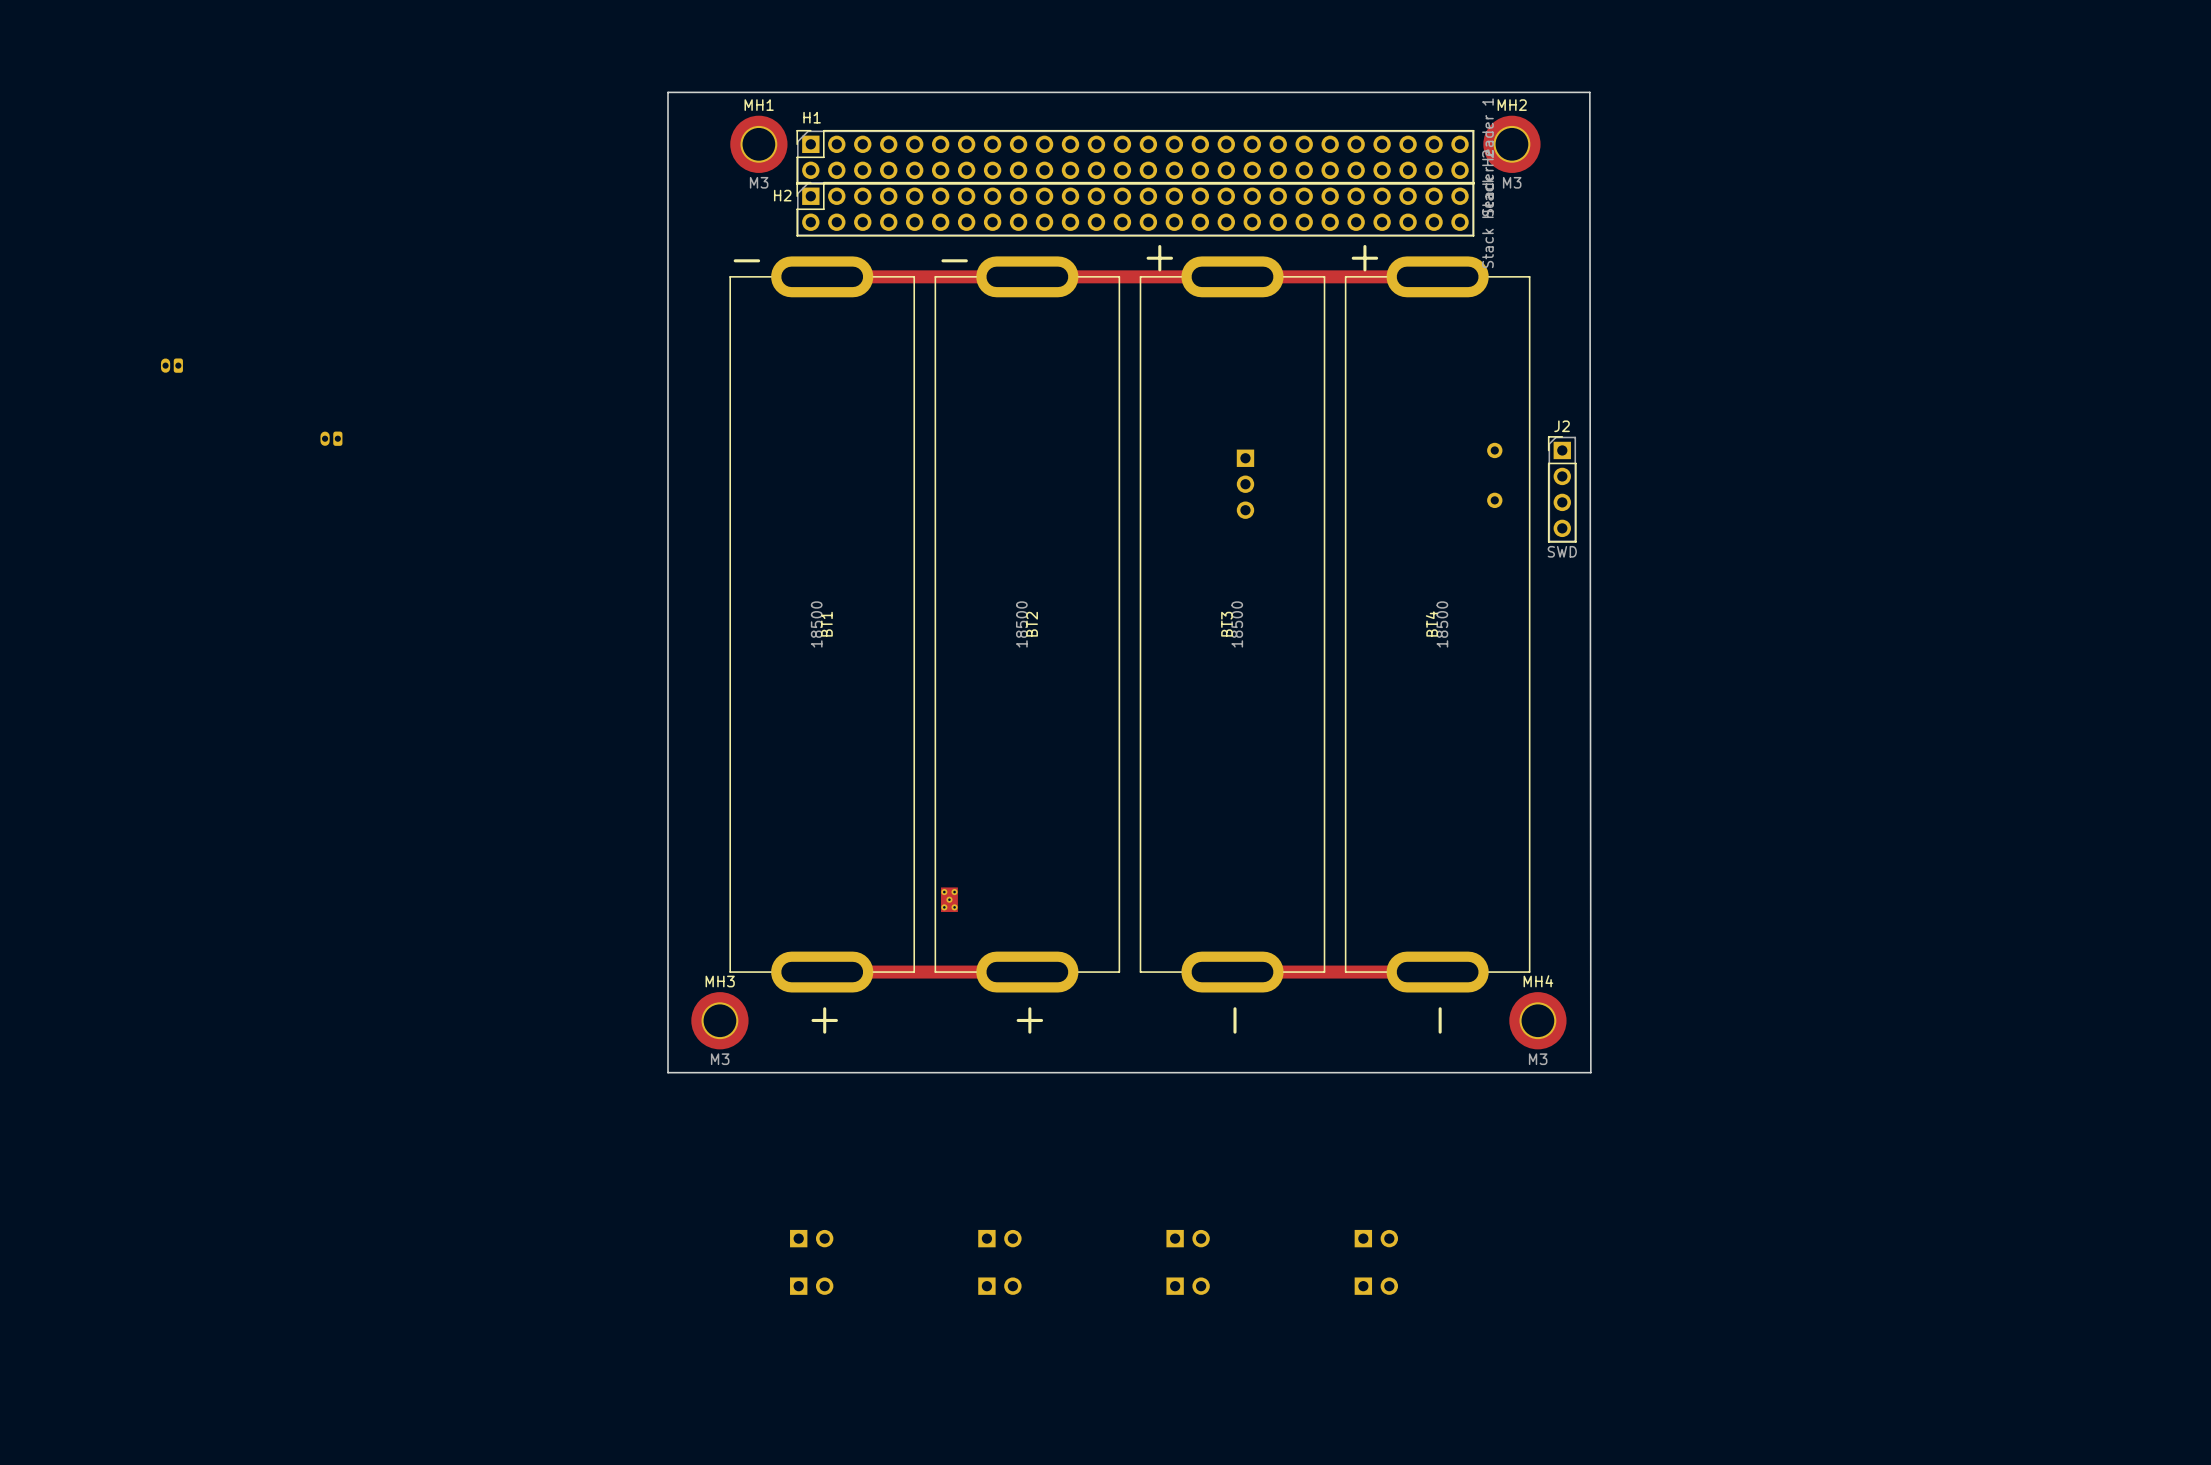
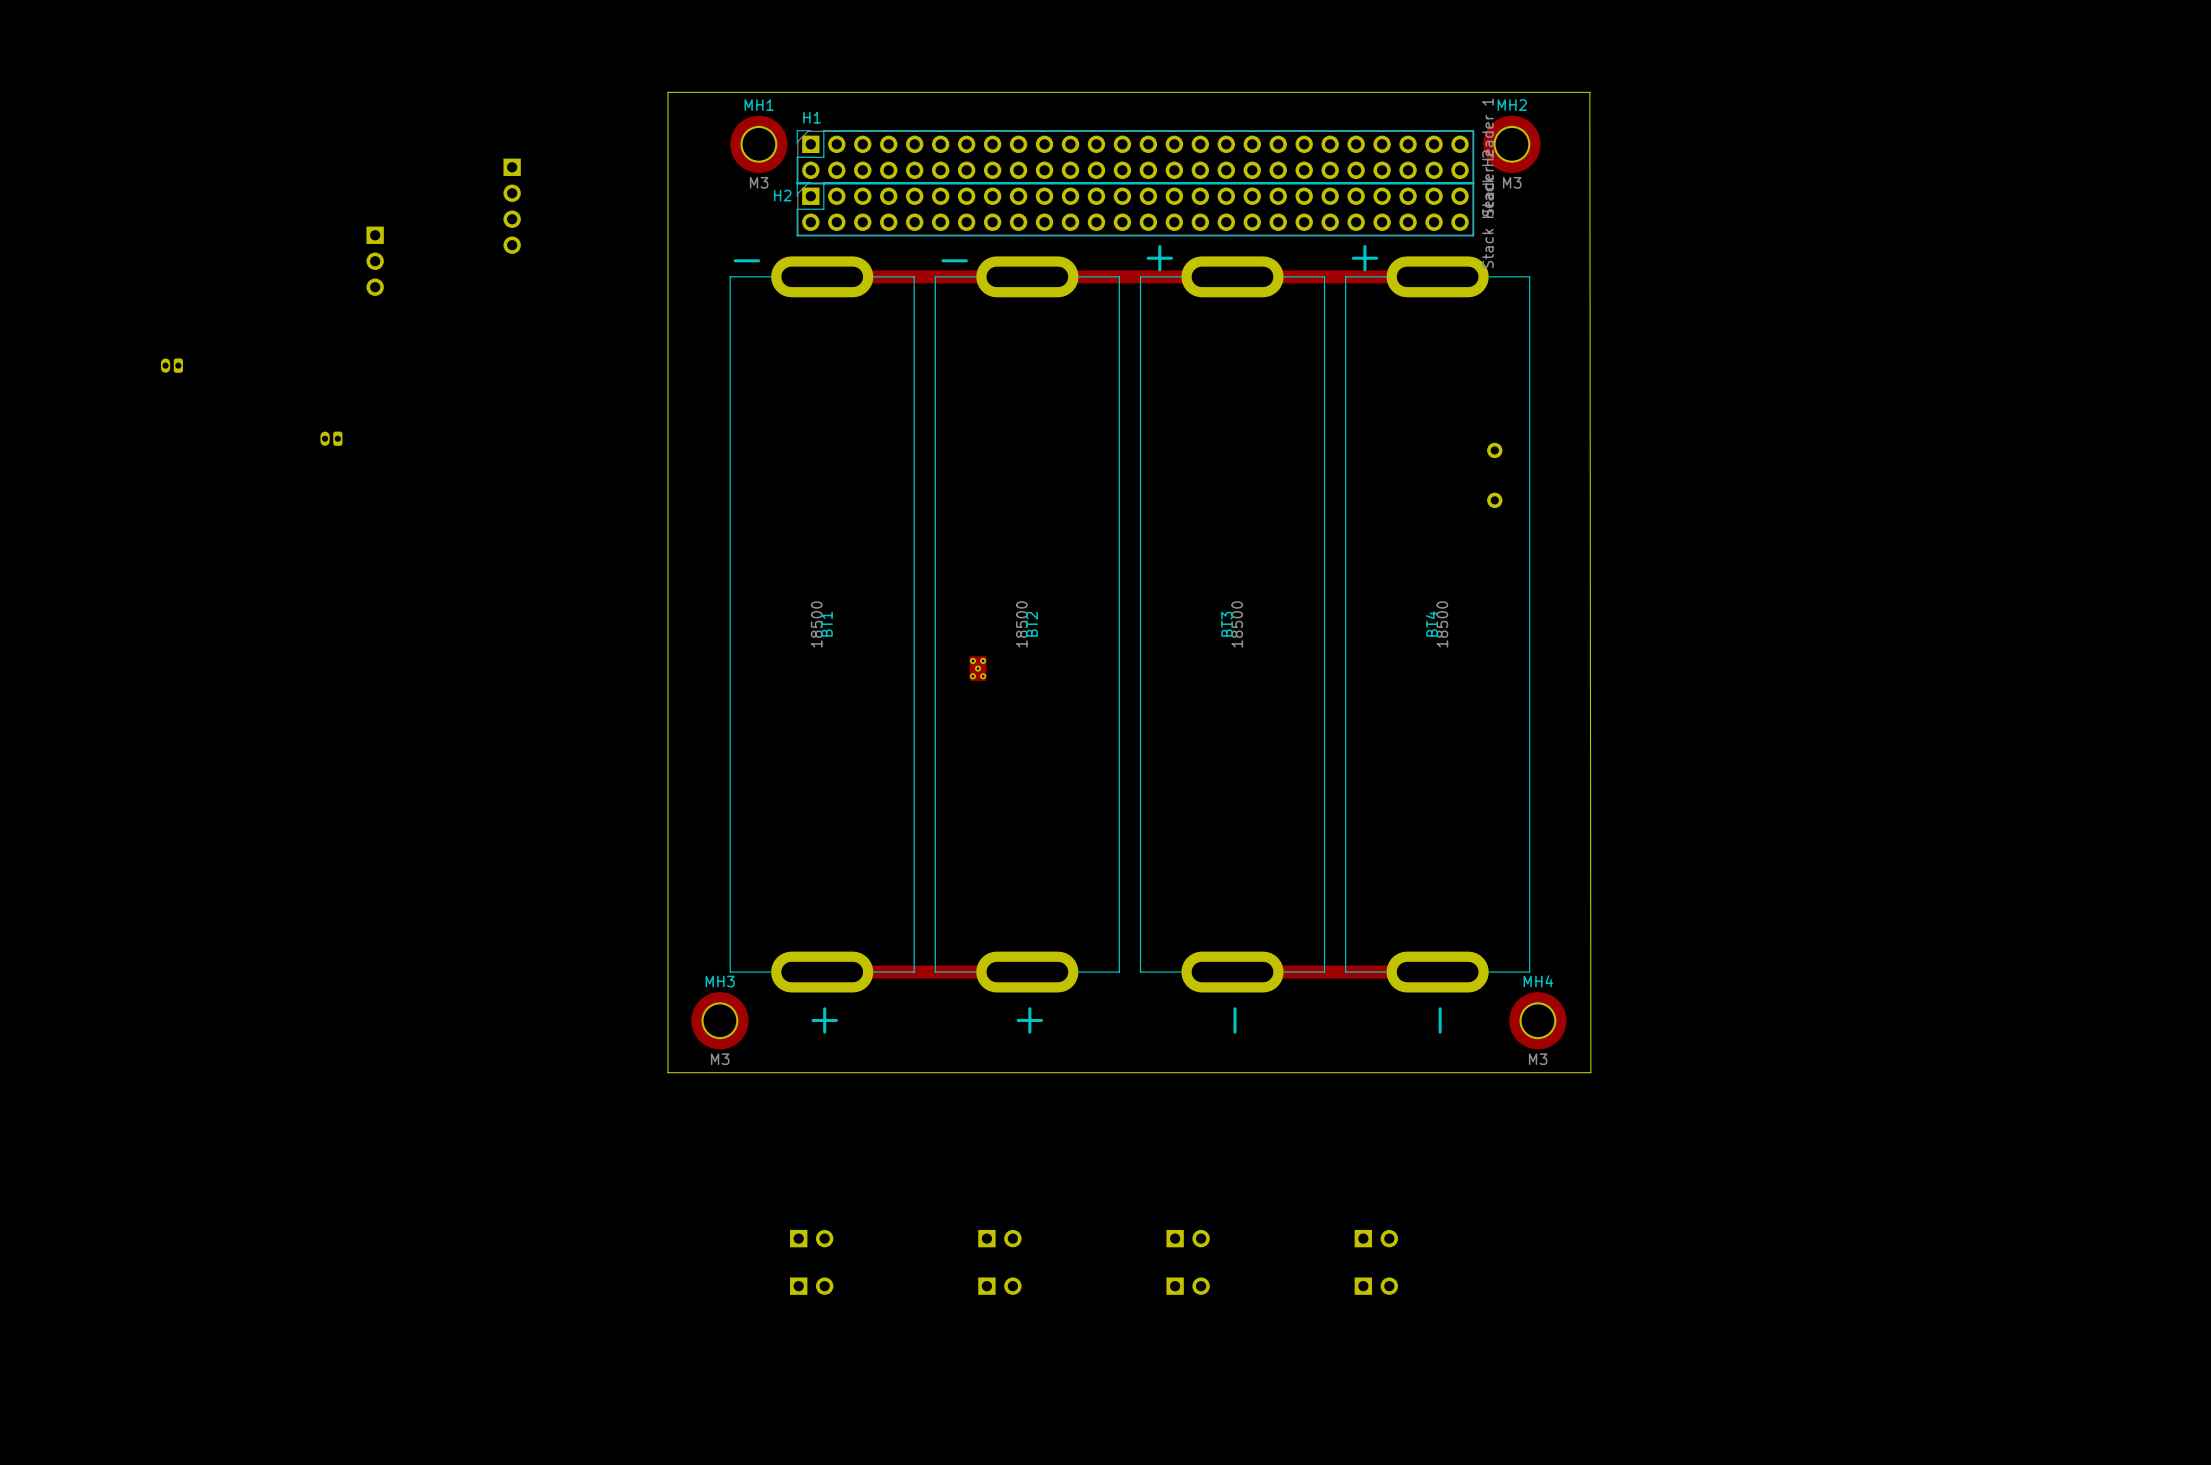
part: none -> (512, 206)
part: none -> (375, 261)
part: (1245, 484) -> none
J2: SWD (1562, 489) -> none
part position: (949, 899) -> (978, 668)

